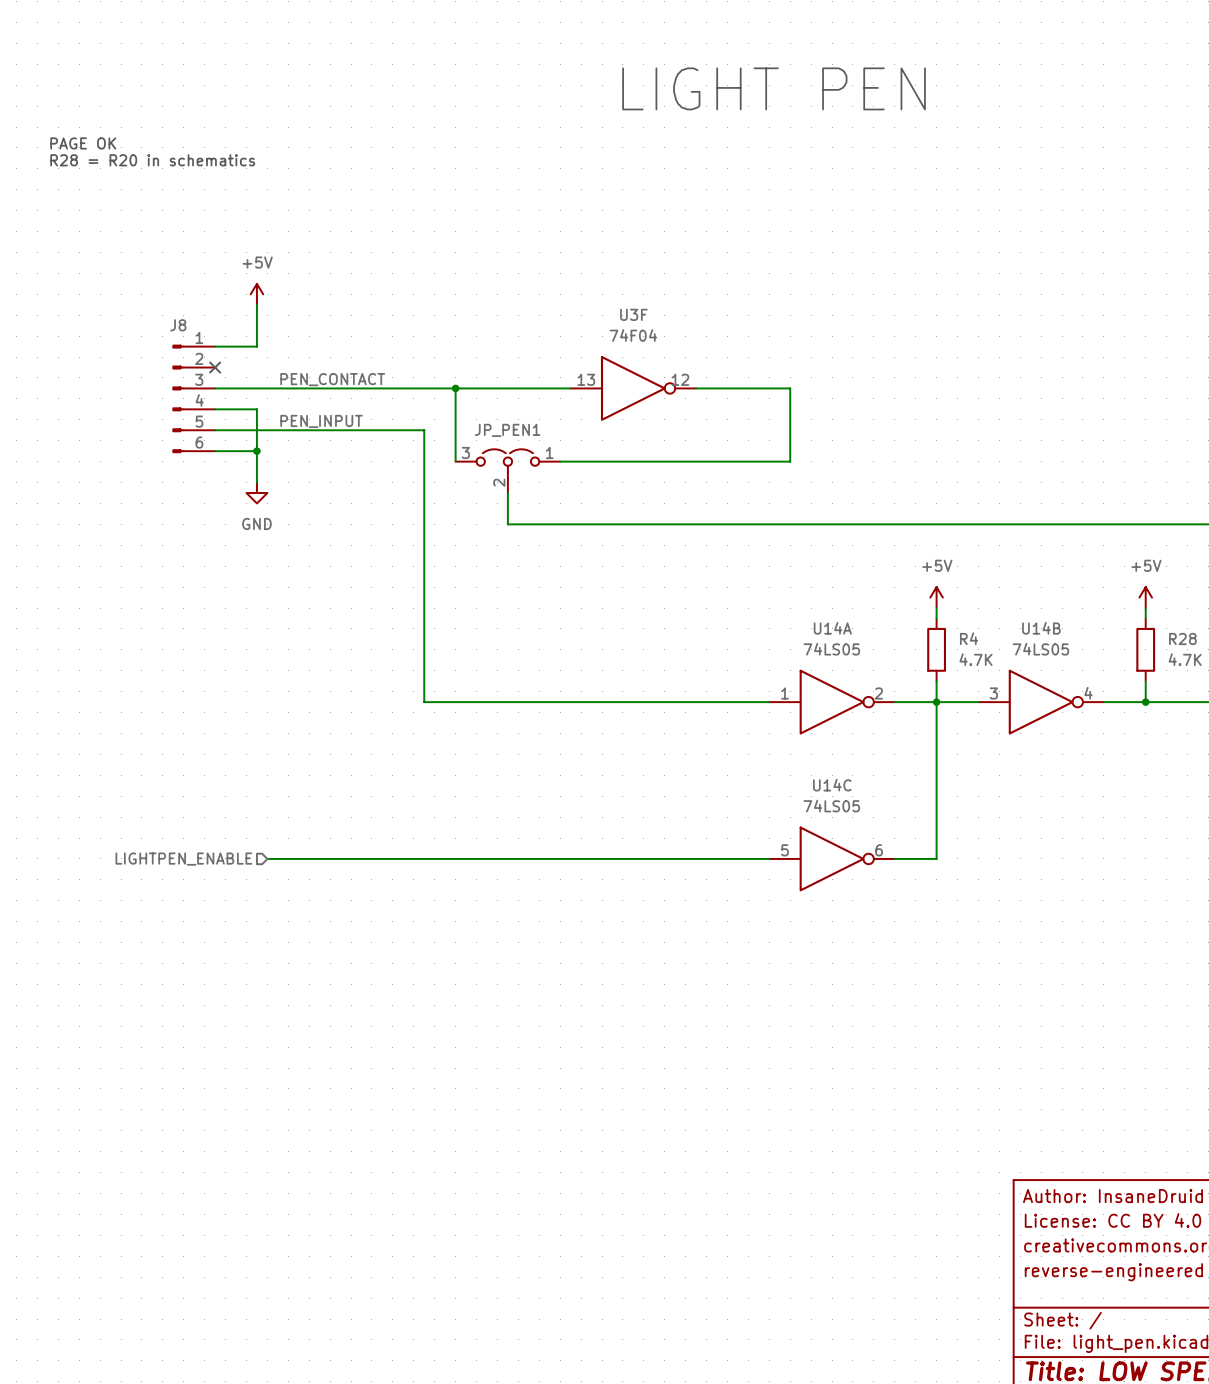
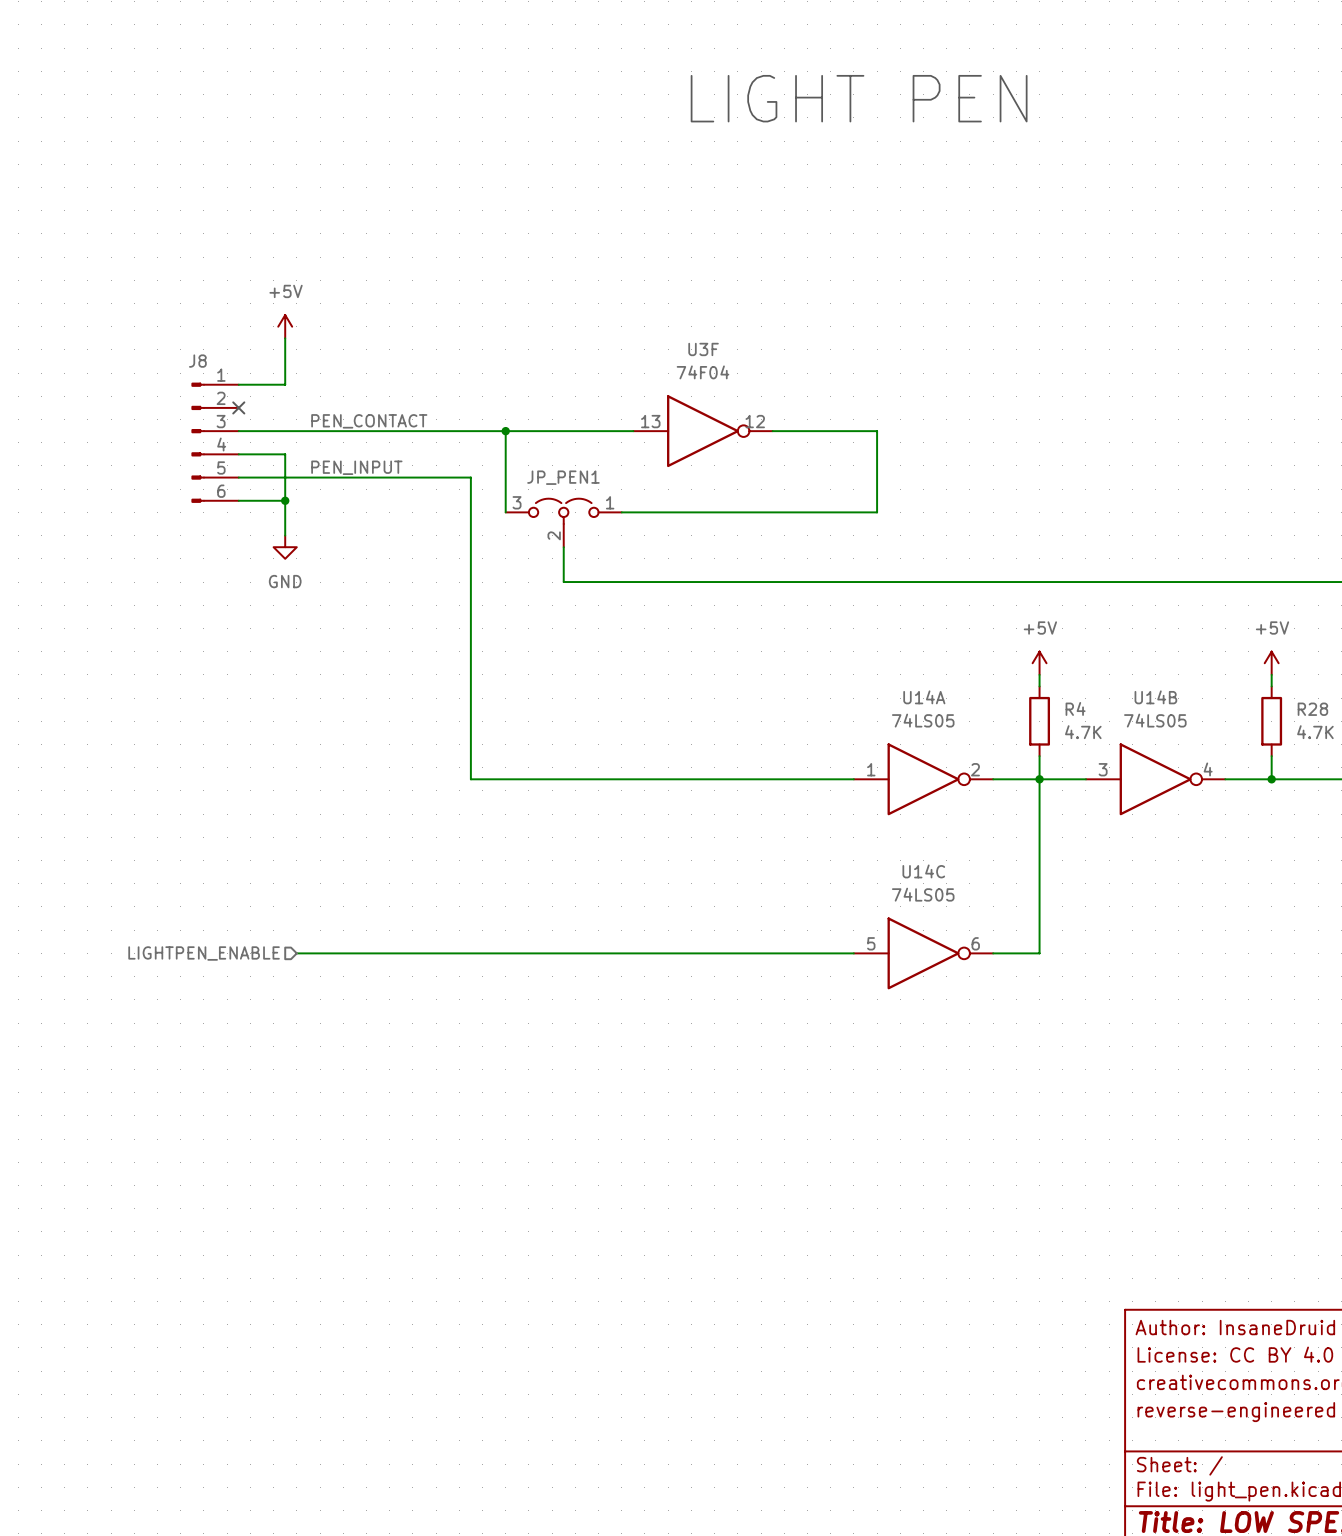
text: PAGE OK (83, 143) -> none
text: R28 = R20 in schematics (152, 160) -> none

